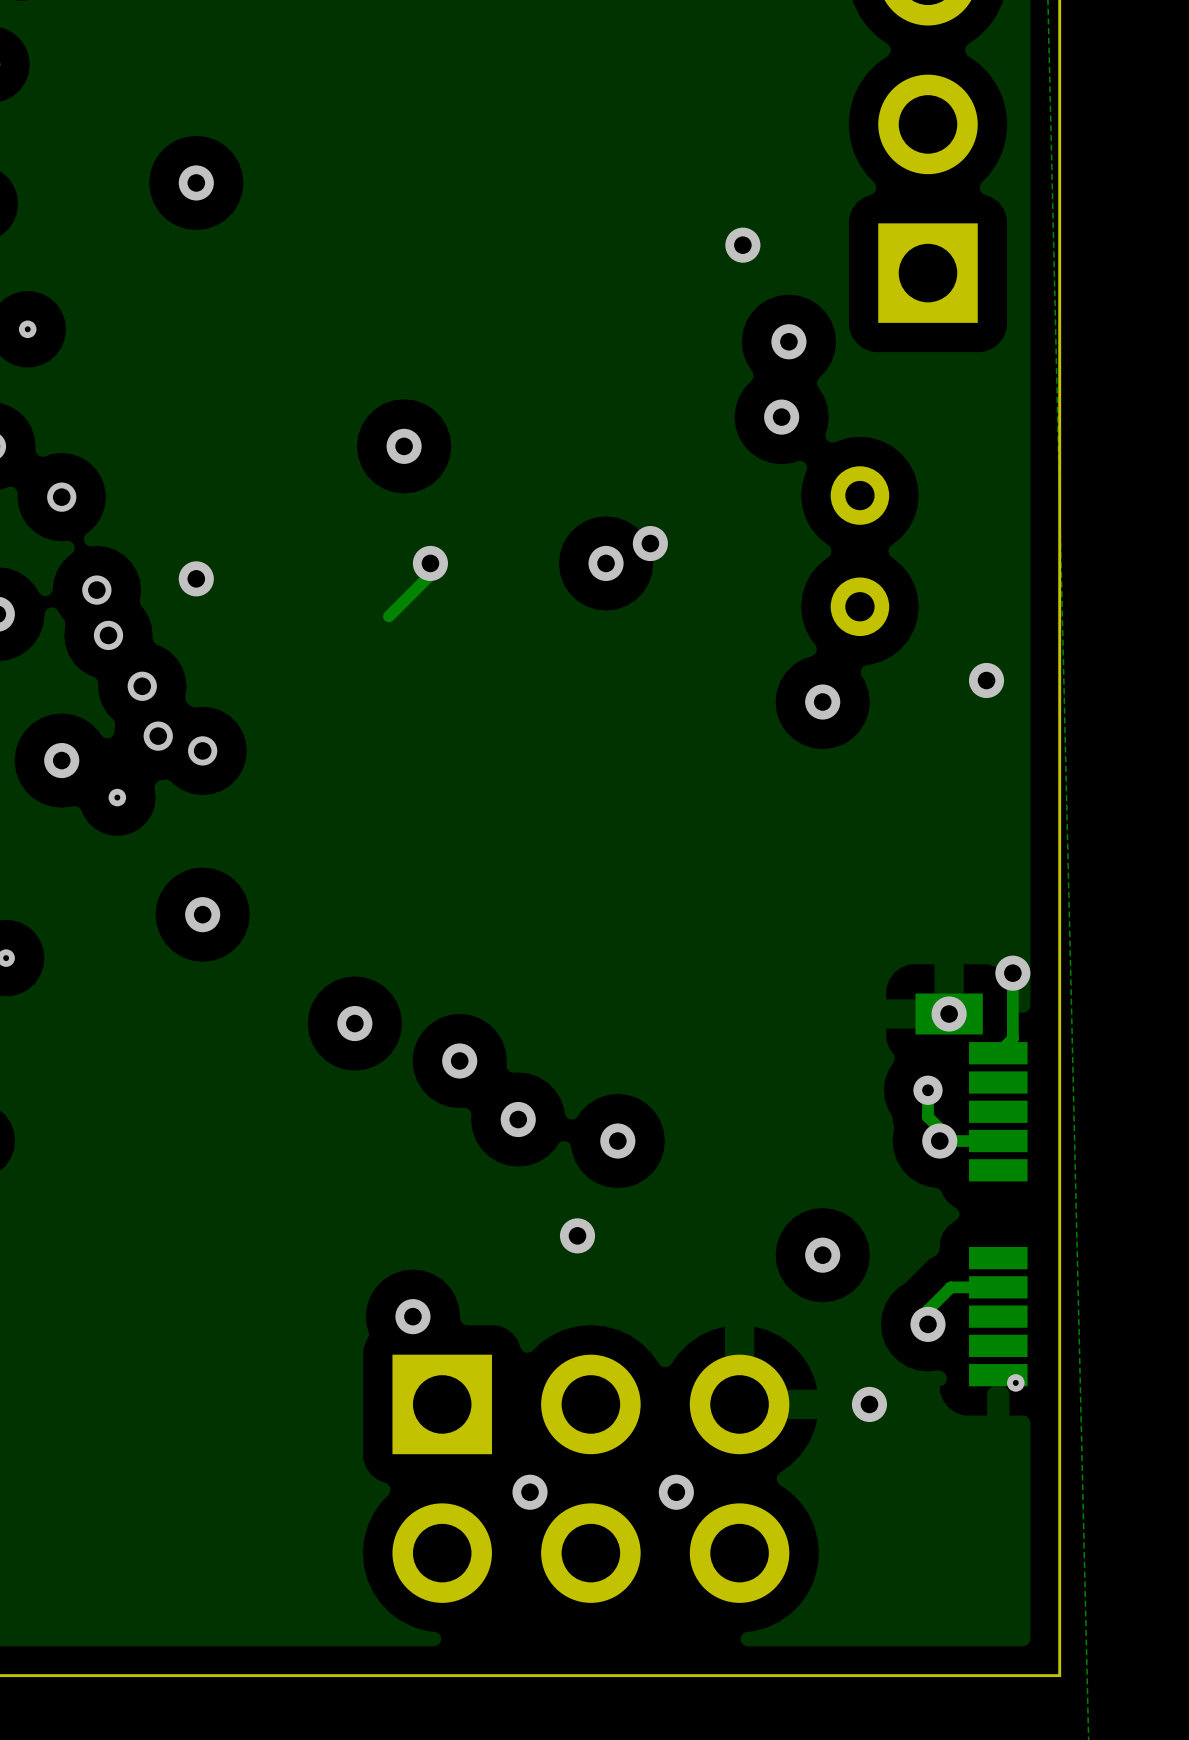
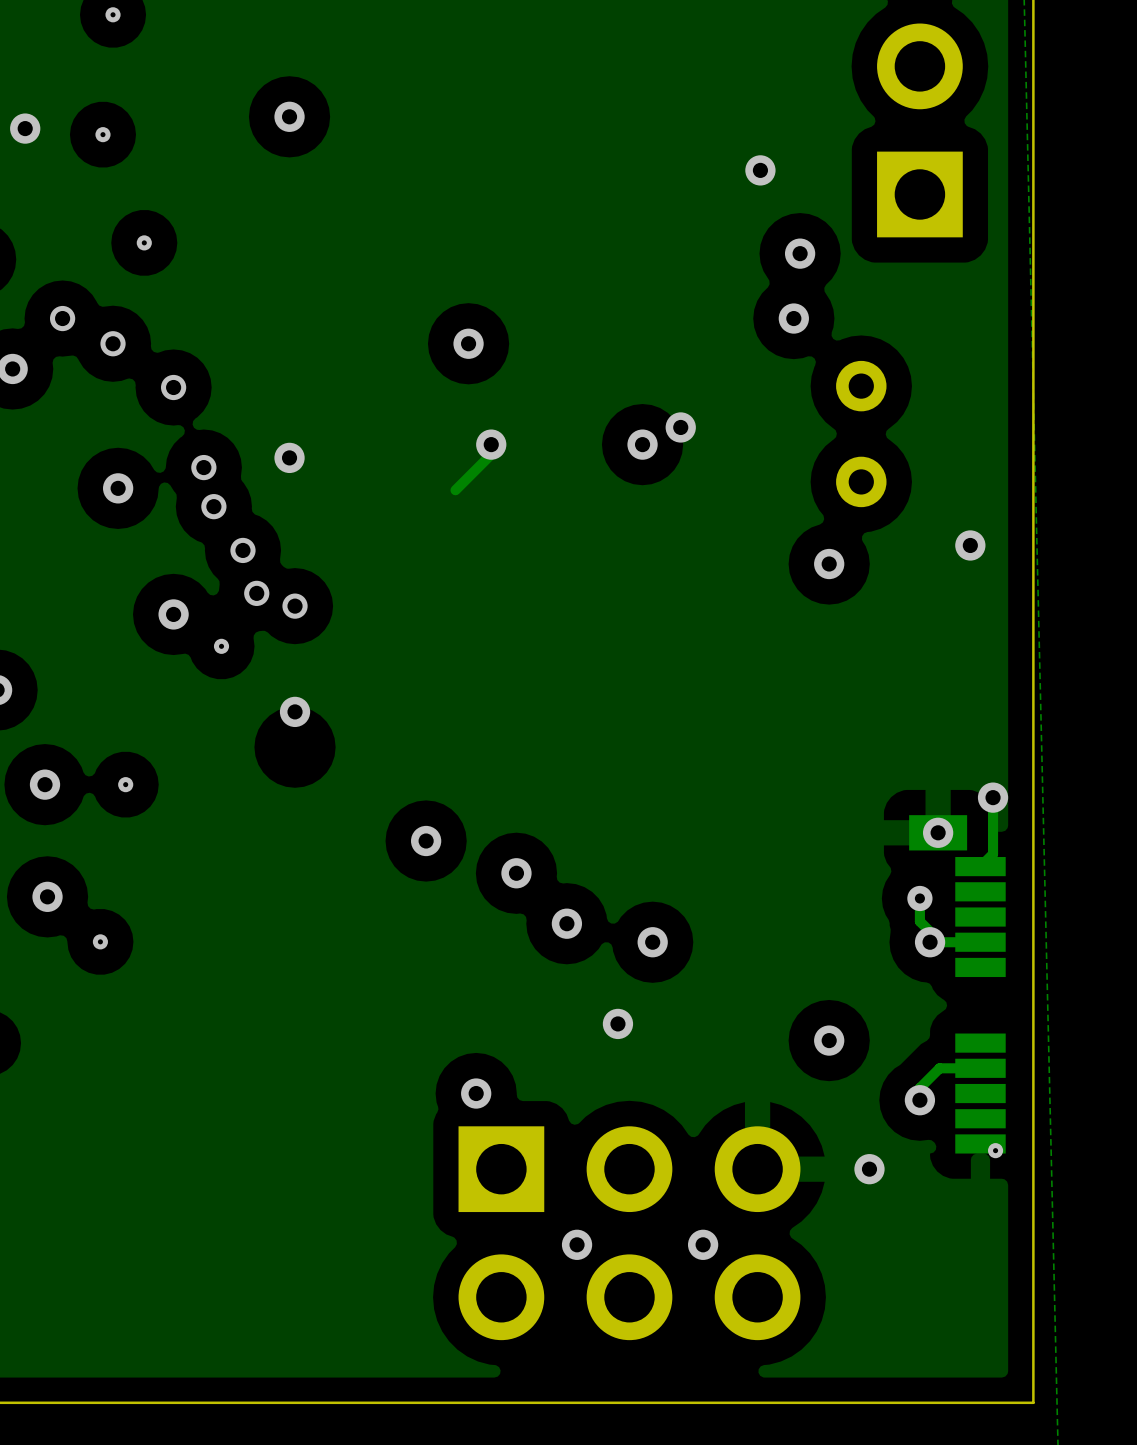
via position: (202, 914) -> (295, 711)

